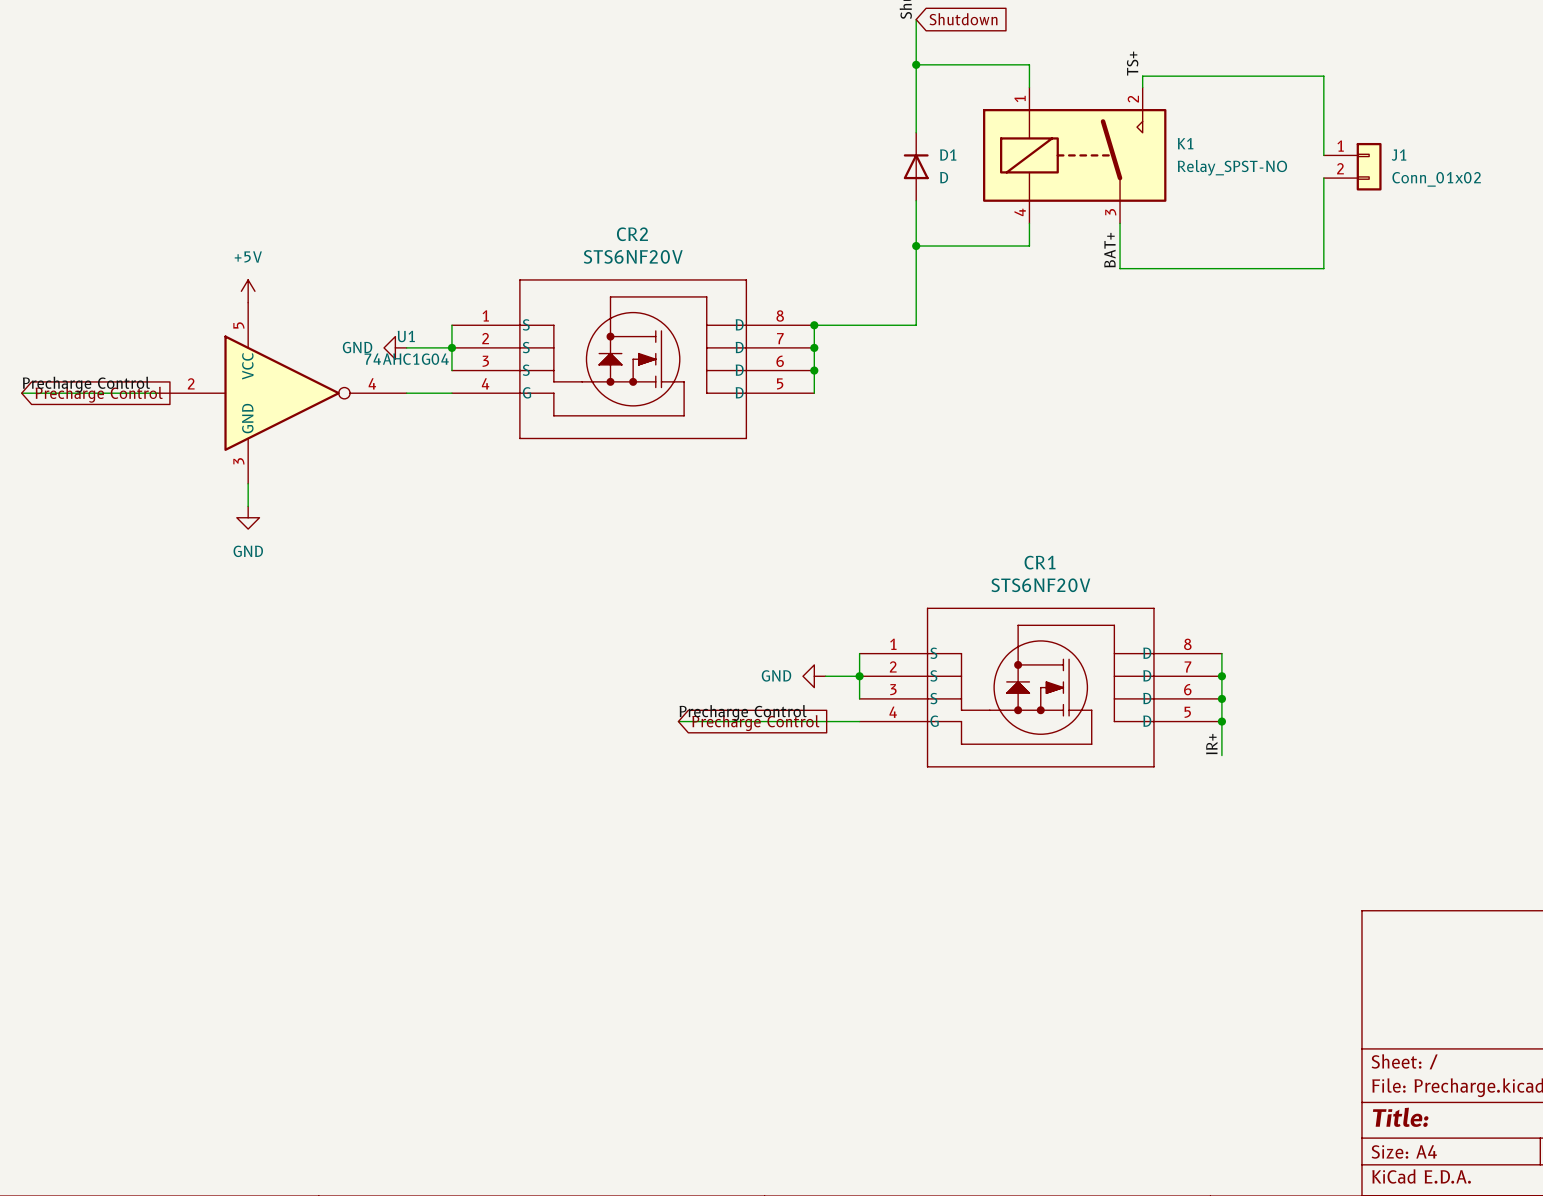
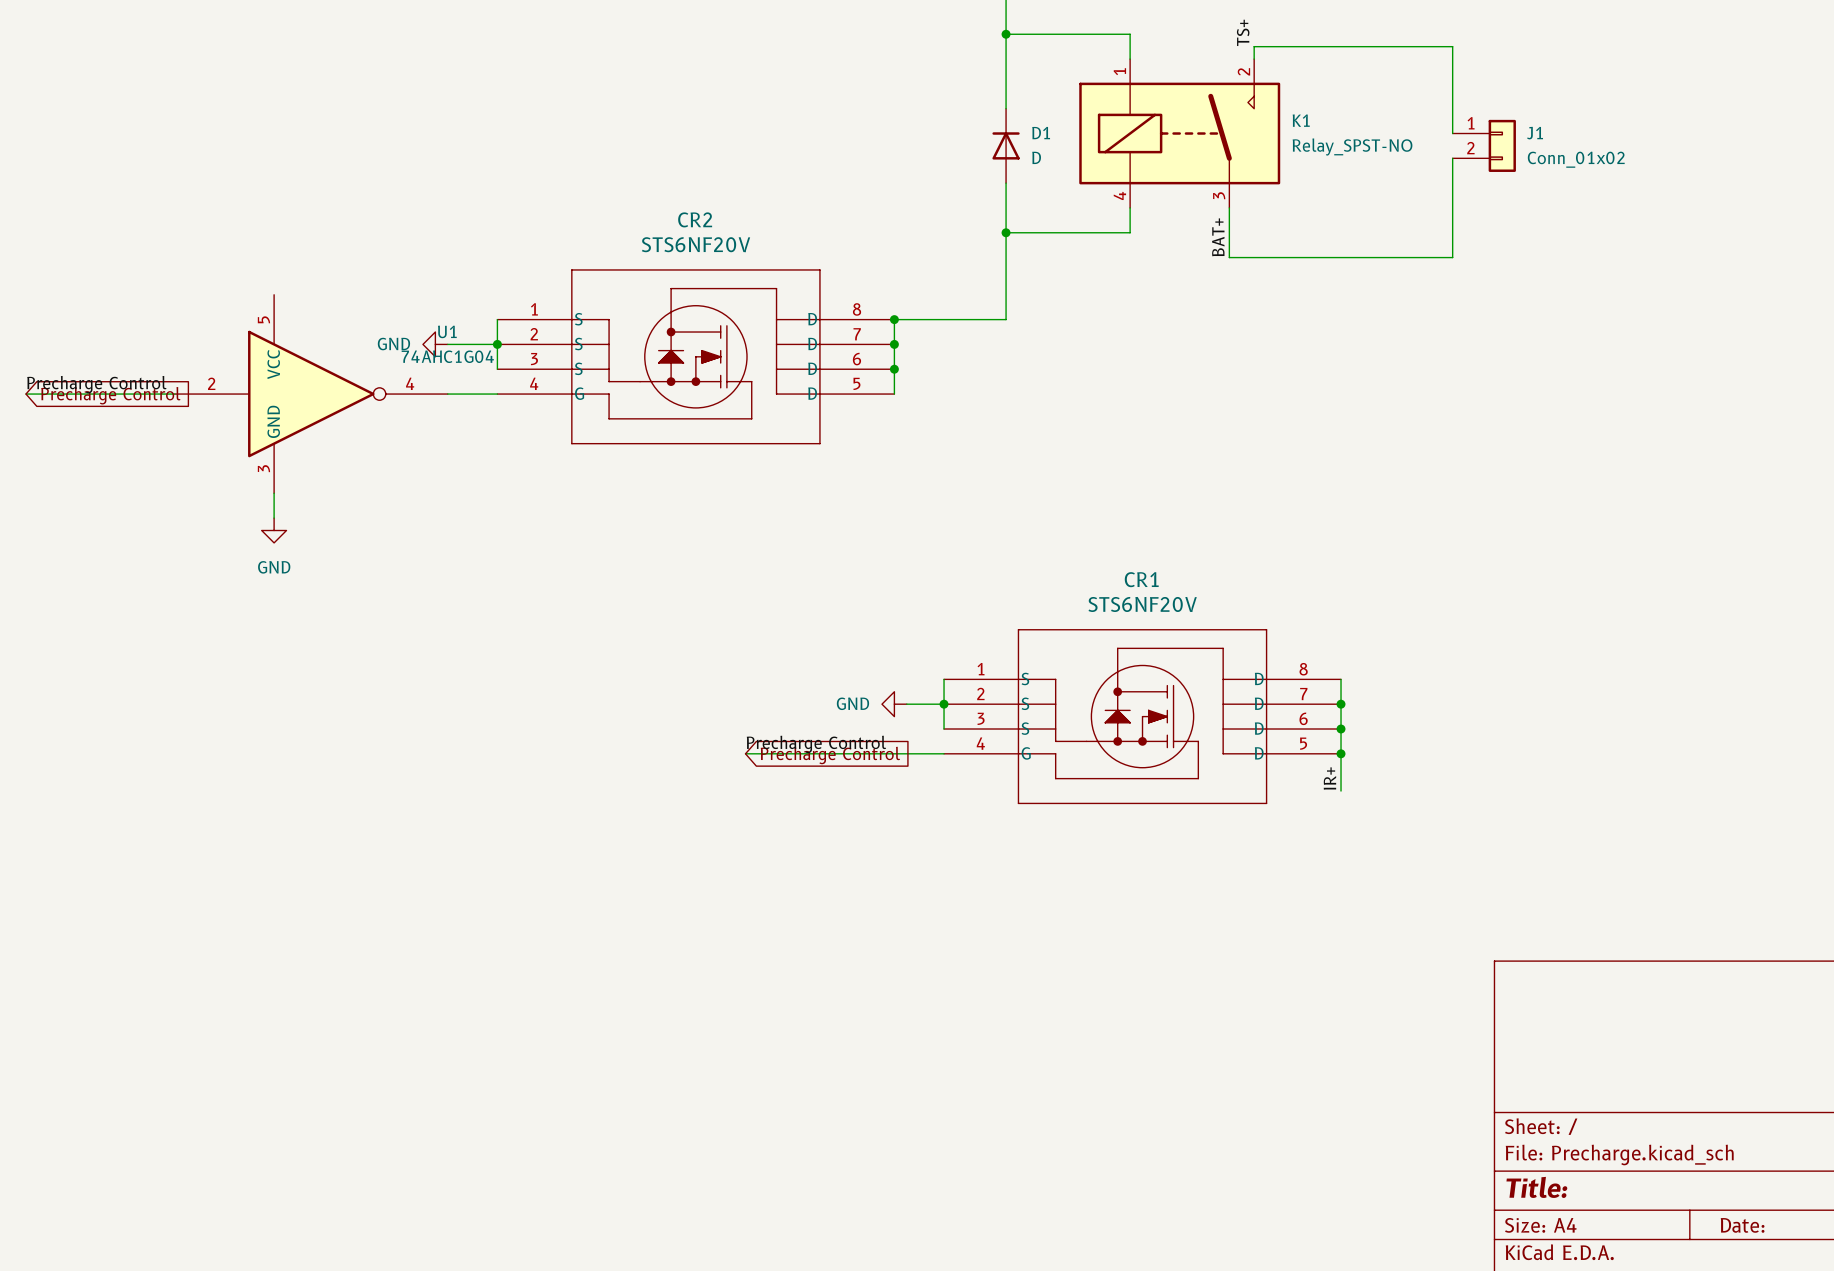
power symbol: +5V (248, 291) -> none

